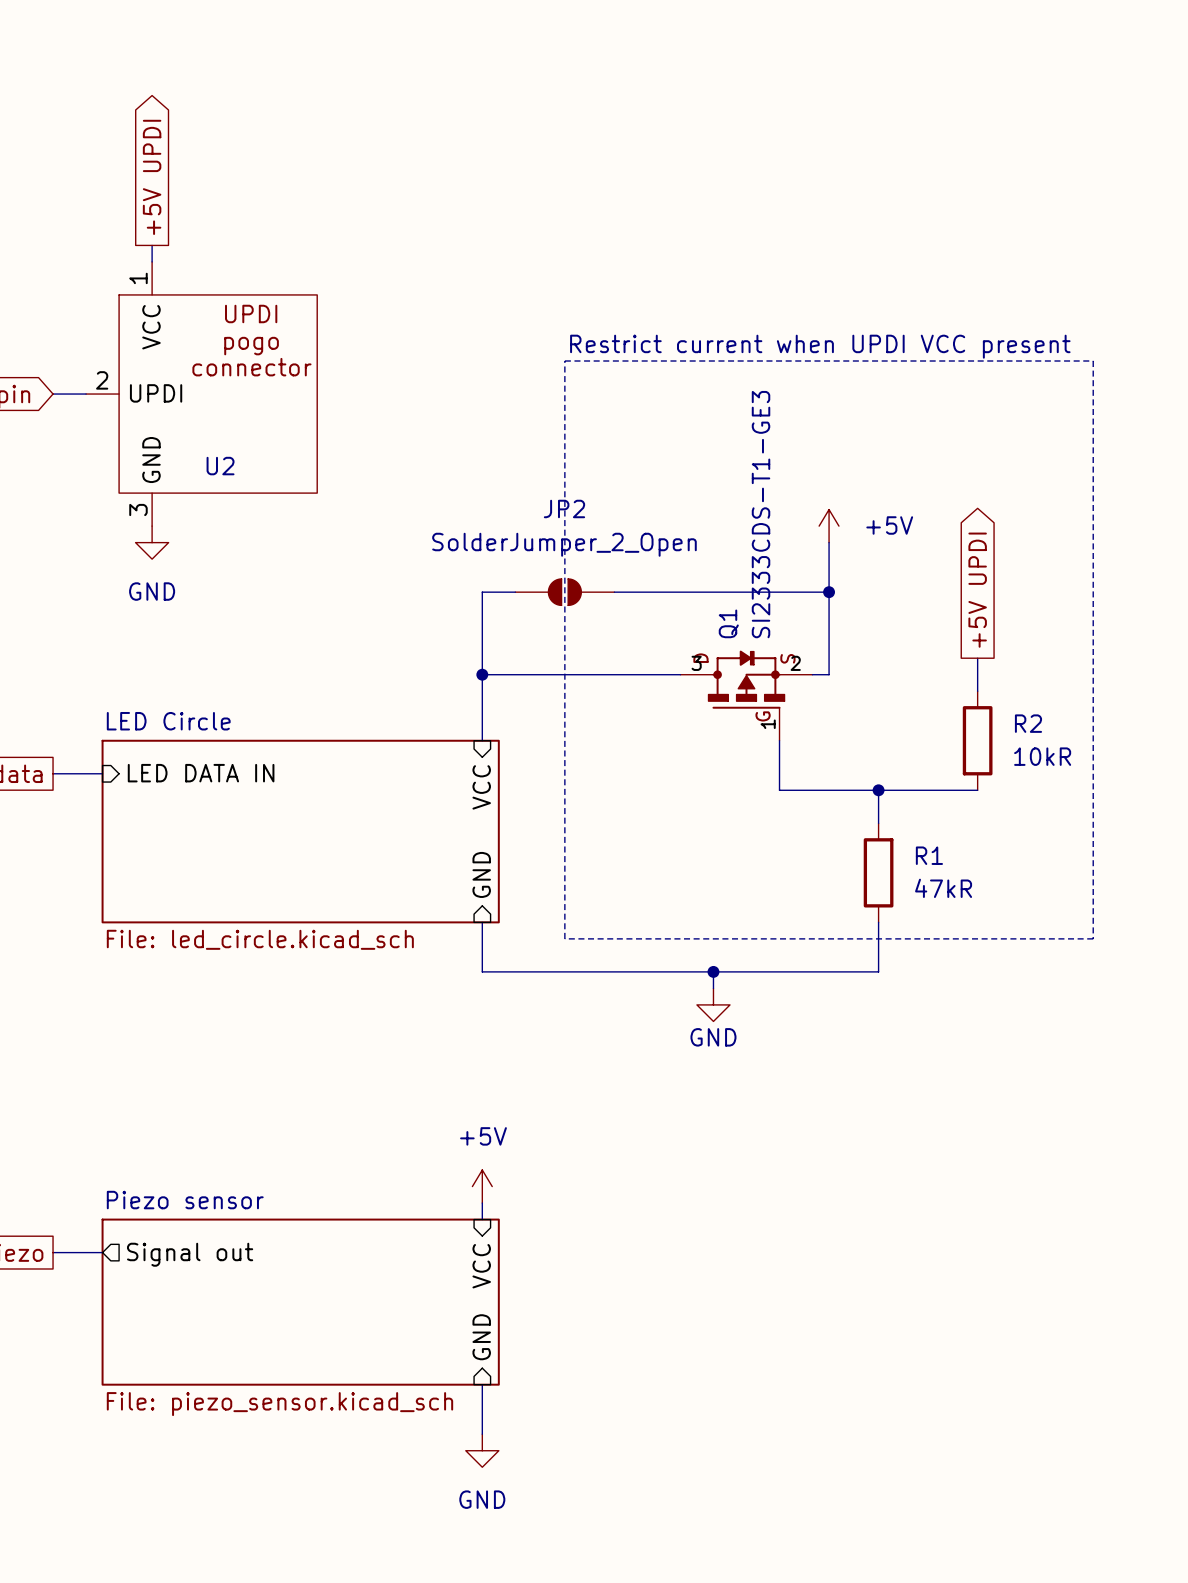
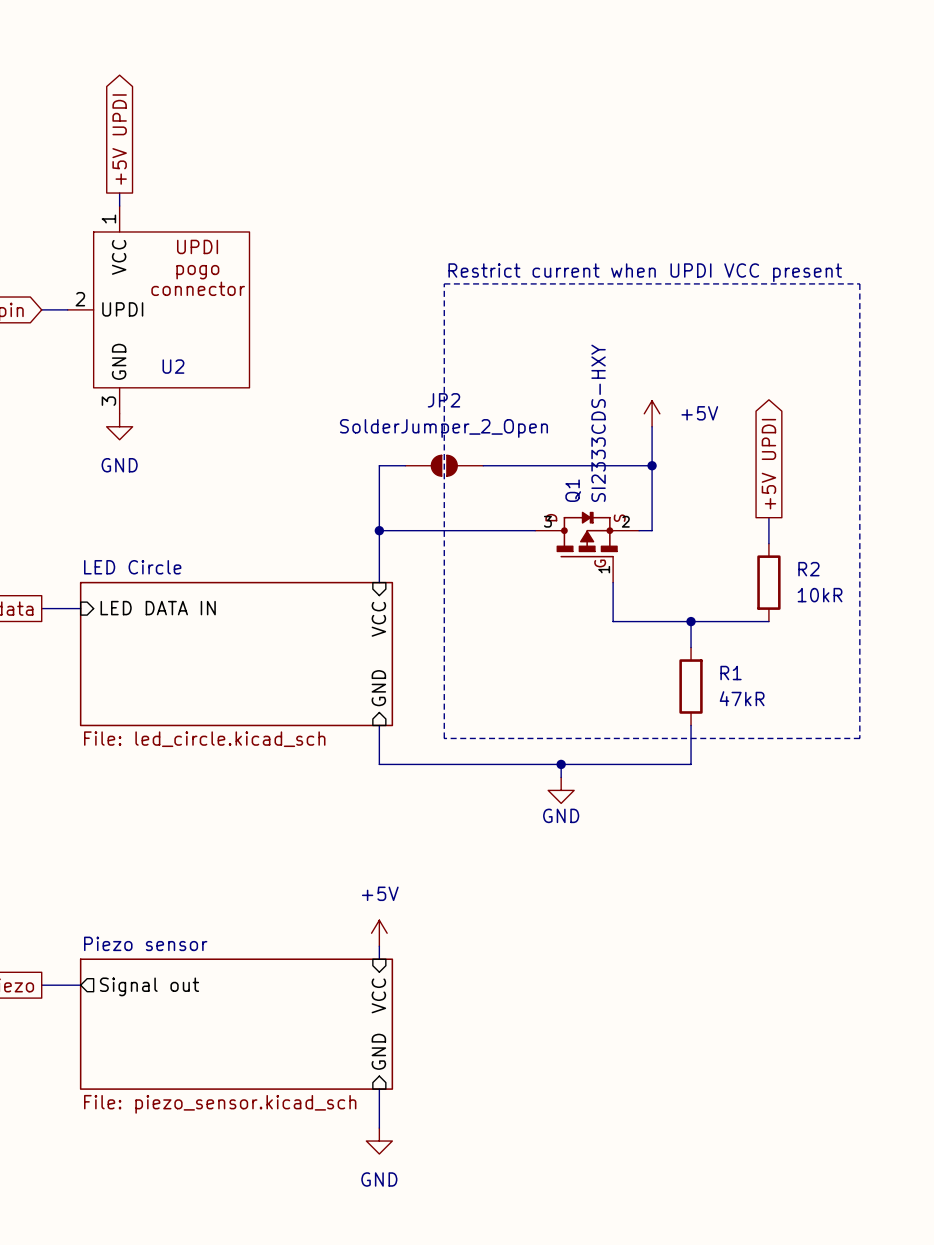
Q1 value: SI2333CDS-T1-GE3 (761, 514) -> SI2333CDS-HXY (598, 423)

